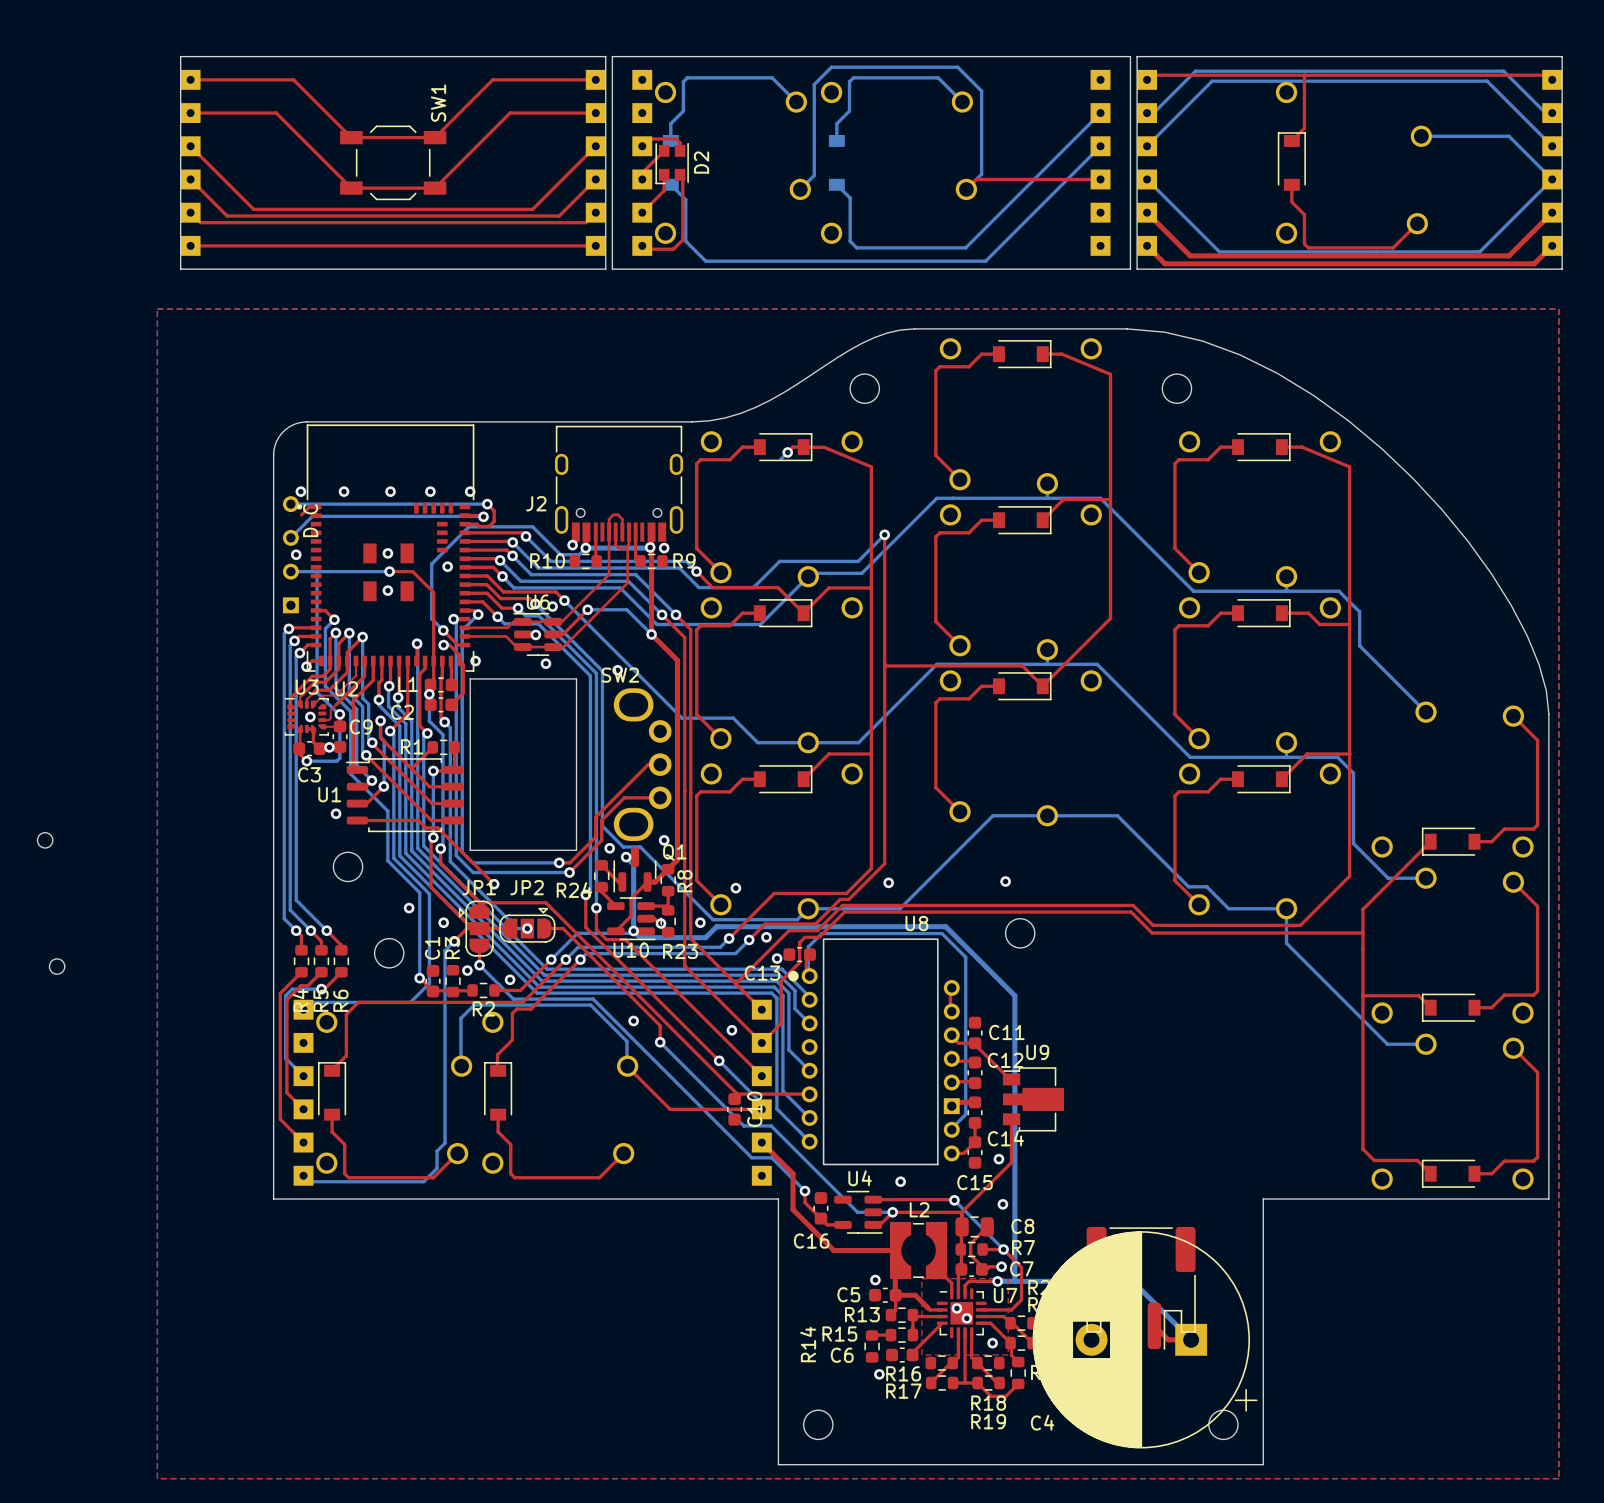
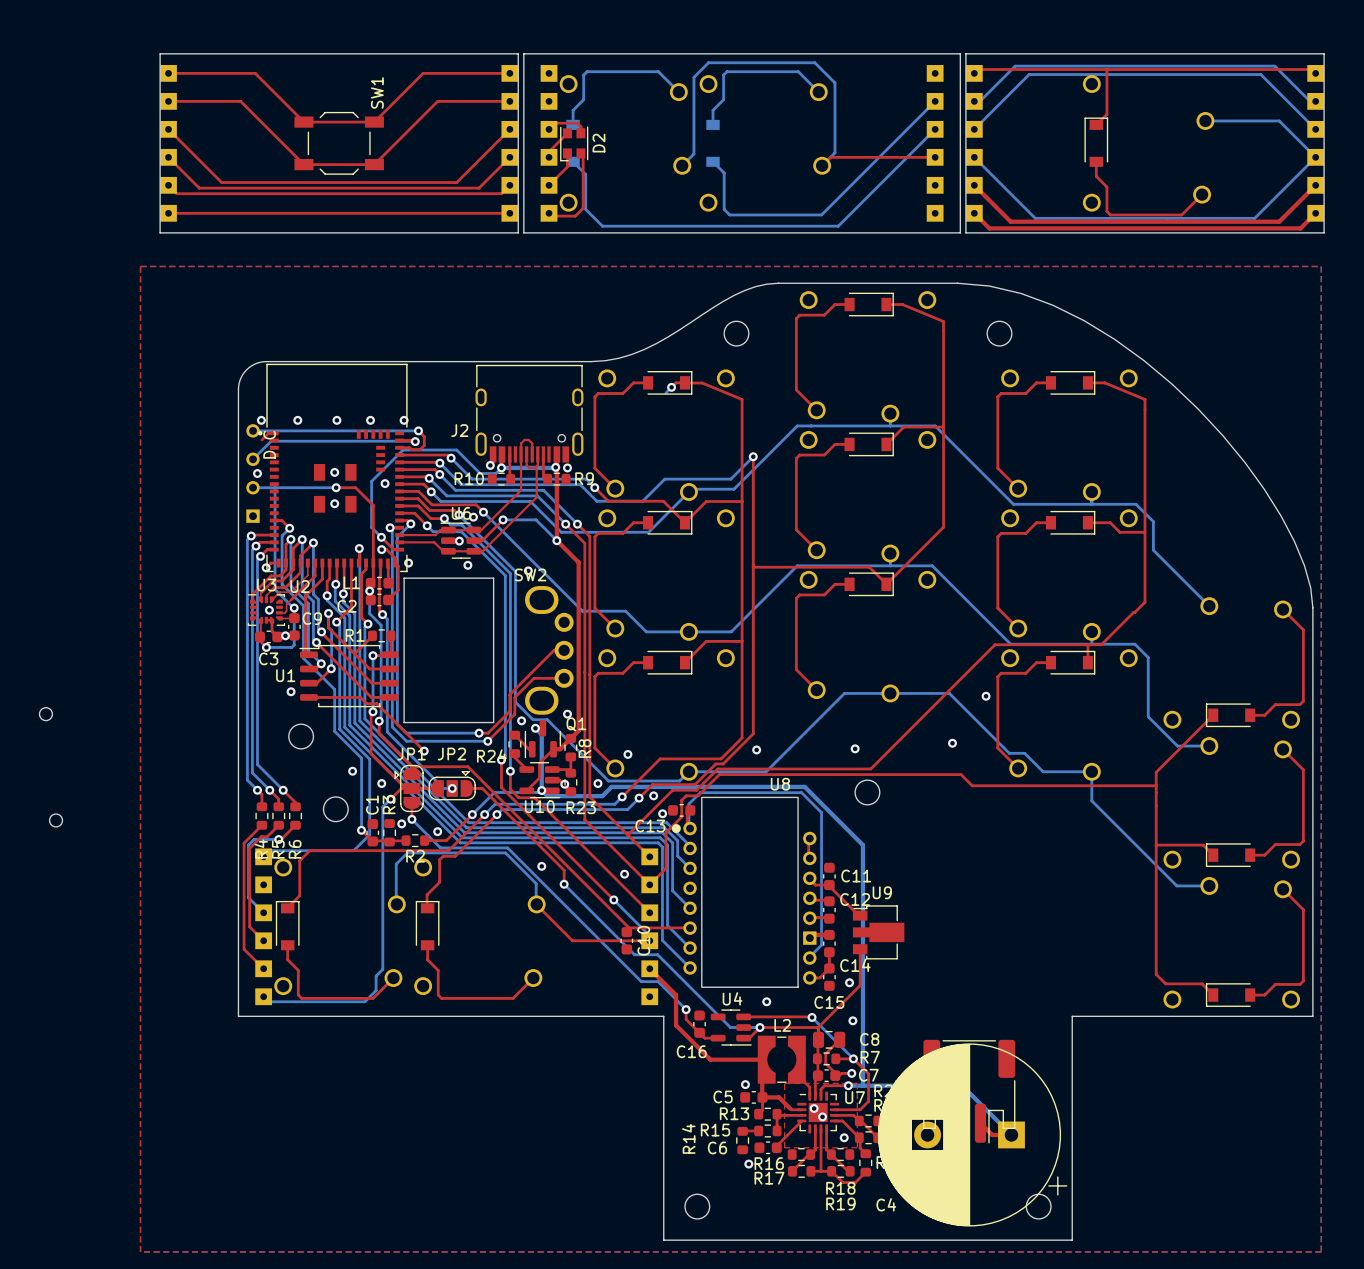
top track: (1349, 707) (1349, 876) (1300, 925) -> (1156, 785) (1103, 785)
top track: none -> (1145, 602) (1101, 644) (995, 644) (870, 768)
top track: (1349, 754) (1307, 754) (1281, 779) -> (1087, 644) (1087, 662)
via: none -> (986, 696)
via: none -> (952, 743)
top track: (1024, 905) (1133, 905) (1153, 925) -> (972, 785) (979, 785)
top track: (1144, 925) (1152, 933) (1362, 933) -> none

